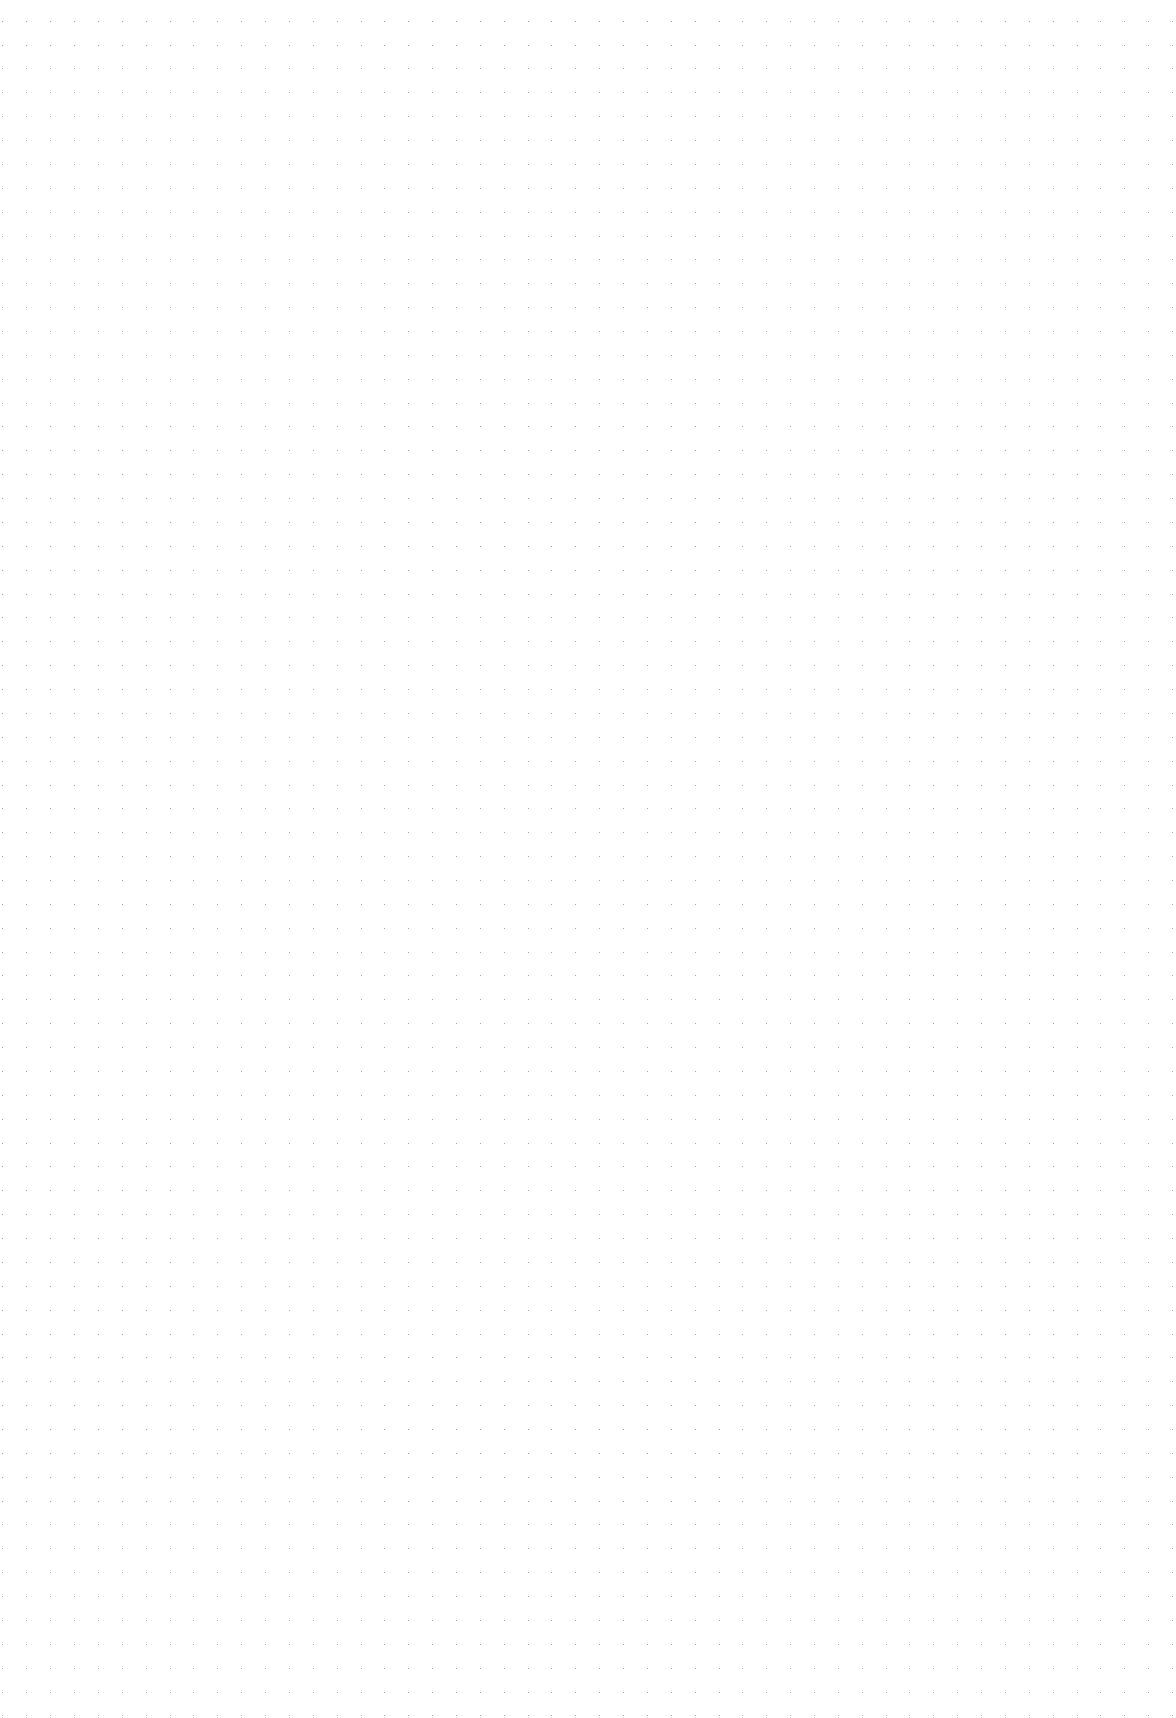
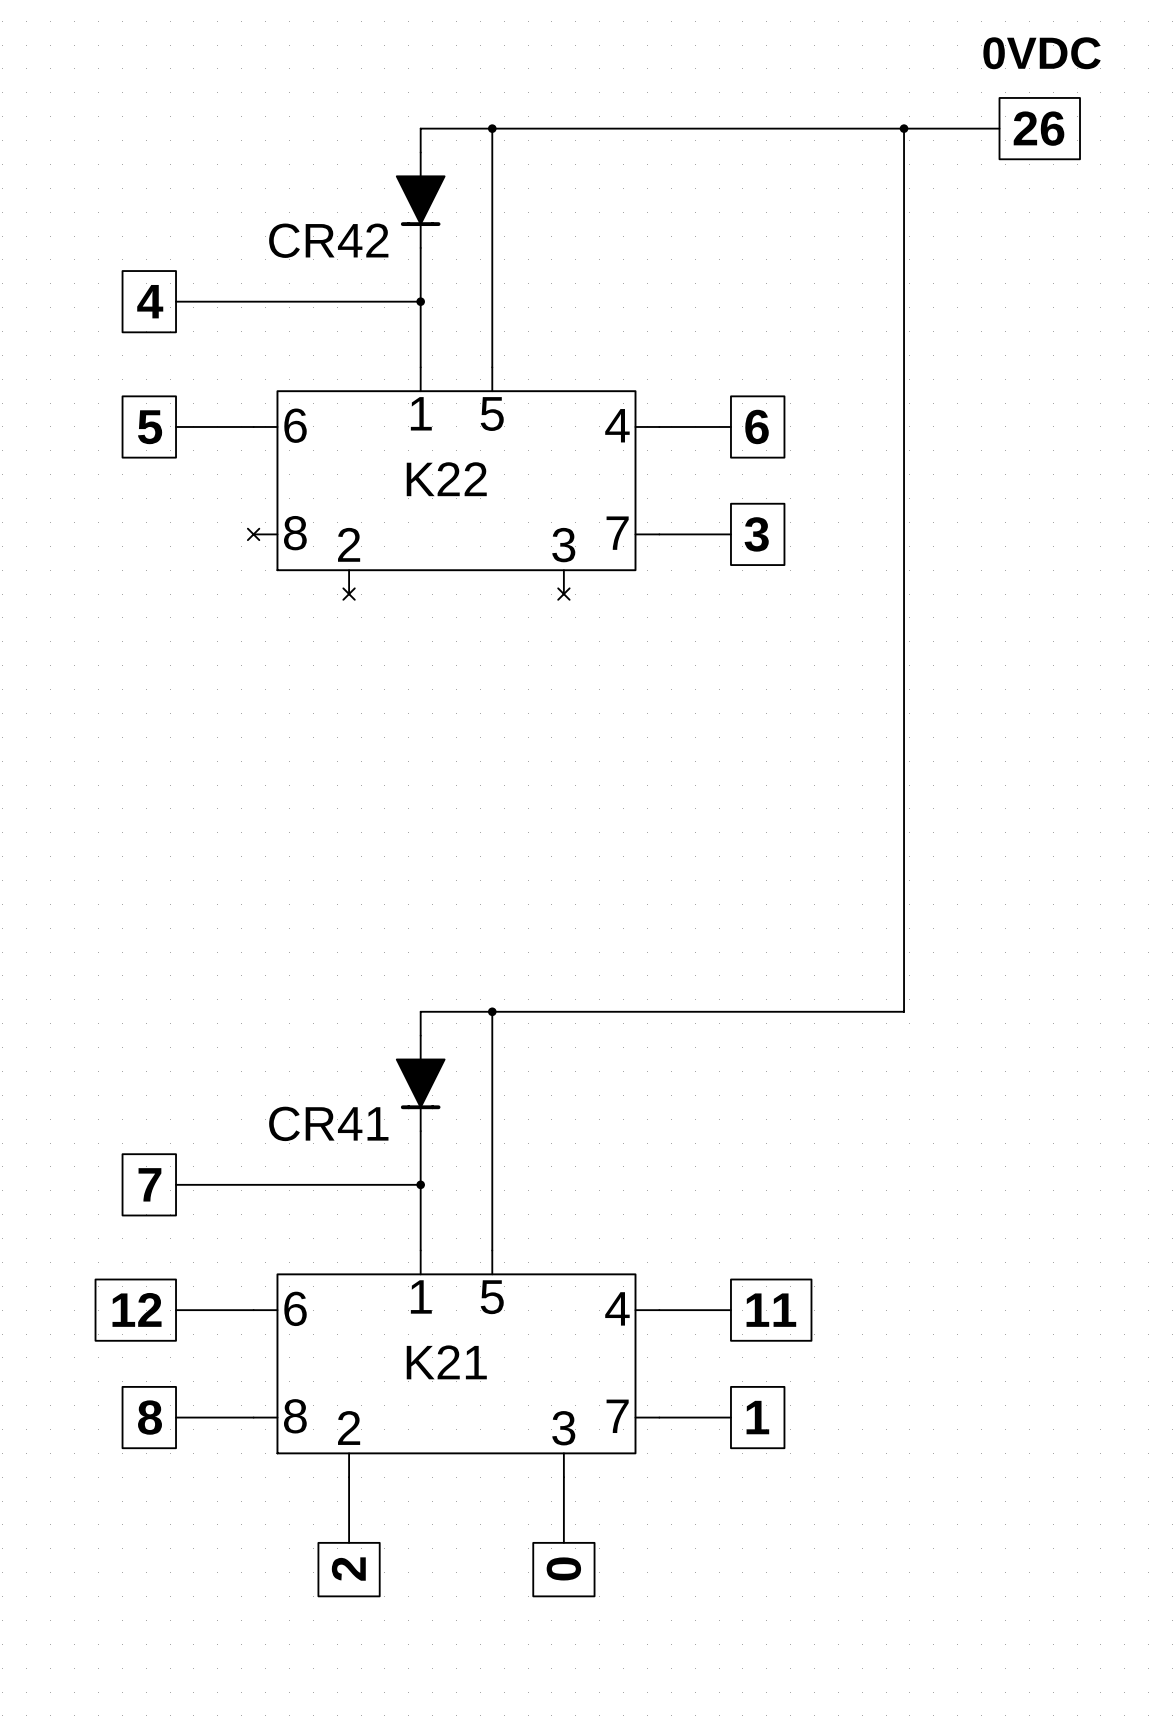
text: none -> 0VDC (1042, 53)
wire: none -> (492, 128) (492, 367)
junction: none -> (492, 128)
wire: none -> (904, 128) (904, 1011) (420, 1011) (420, 1035)
junction: none -> (904, 128)
wire: none -> (999, 128) (420, 128) (420, 152)
global label: none -> 26 (1039, 128)
CR42: none -> (420, 200)
wire: none -> (420, 247) (420, 367)
global label: none -> 4 (150, 301)
wire: none -> (176, 301) (420, 301)
junction: none -> (420, 301)
wire: none -> (176, 426) (253, 426)
wire: none -> (659, 426) (730, 426)
global label: none -> 6 (757, 426)
global label: none -> 5 (150, 427)
K22: none -> (456, 480)
no-connect mark: none -> (253, 534)
wire: none -> (659, 534) (730, 534)
global label: none -> 3 (756, 534)
no-connect mark: none -> (349, 594)
no-connect mark: none -> (563, 594)
wire: none -> (492, 1011) (492, 1250)
junction: none -> (492, 1011)
CR41: none -> (420, 1083)
wire: none -> (420, 1131) (420, 1250)
global label: none -> 7 (149, 1184)
wire: none -> (176, 1184) (420, 1184)
junction: none -> (420, 1184)
global label: none -> 12 (137, 1309)
wire: none -> (176, 1310) (253, 1310)
wire: none -> (659, 1310) (730, 1310)
global label: none -> 11 (771, 1310)
K21: none -> (456, 1363)
global label: none -> 8 (150, 1417)
wire: none -> (176, 1417) (253, 1417)
wire: none -> (659, 1417) (730, 1417)
global label: none -> 1 (757, 1417)
wire: none -> (349, 1477) (349, 1542)
wire: none -> (563, 1477) (563, 1542)
global label: none -> 0 (563, 1568)
global label: none -> 2 (348, 1569)

